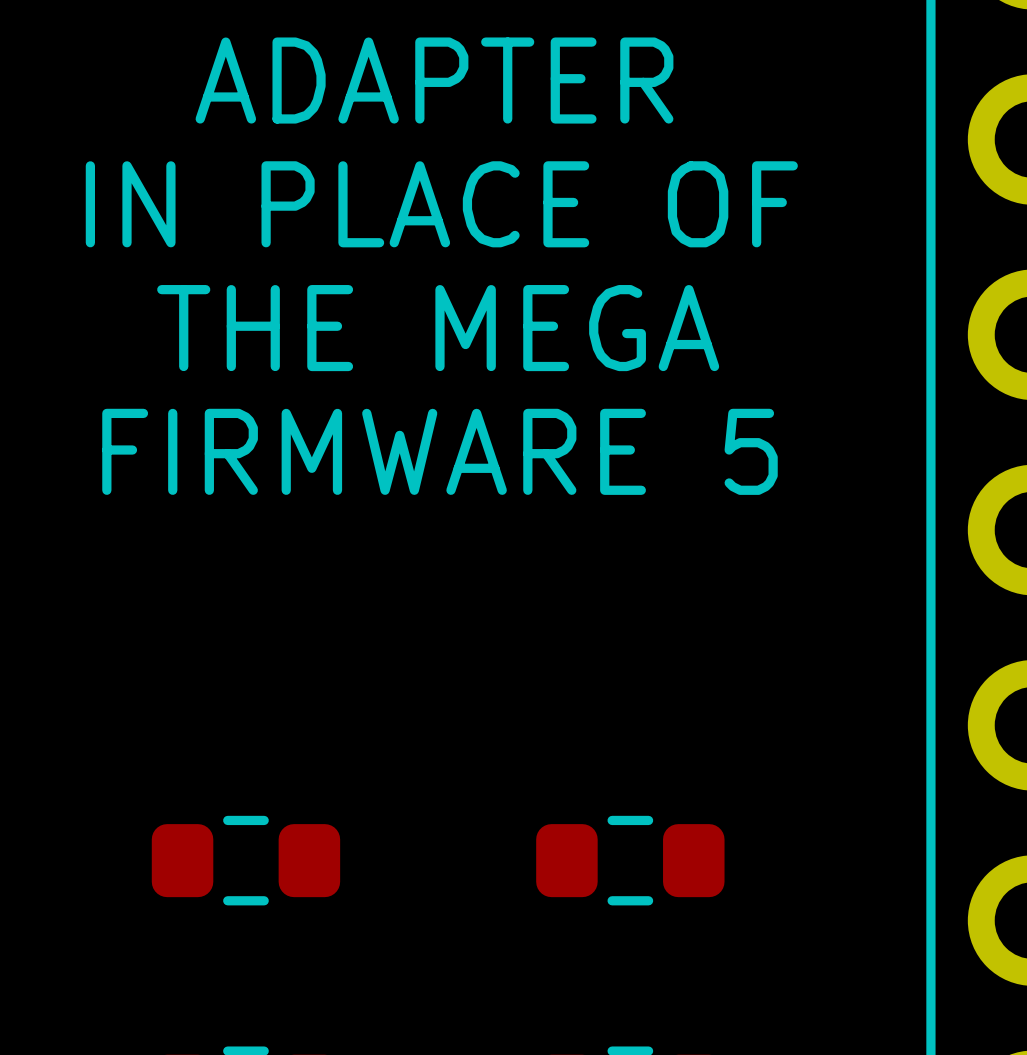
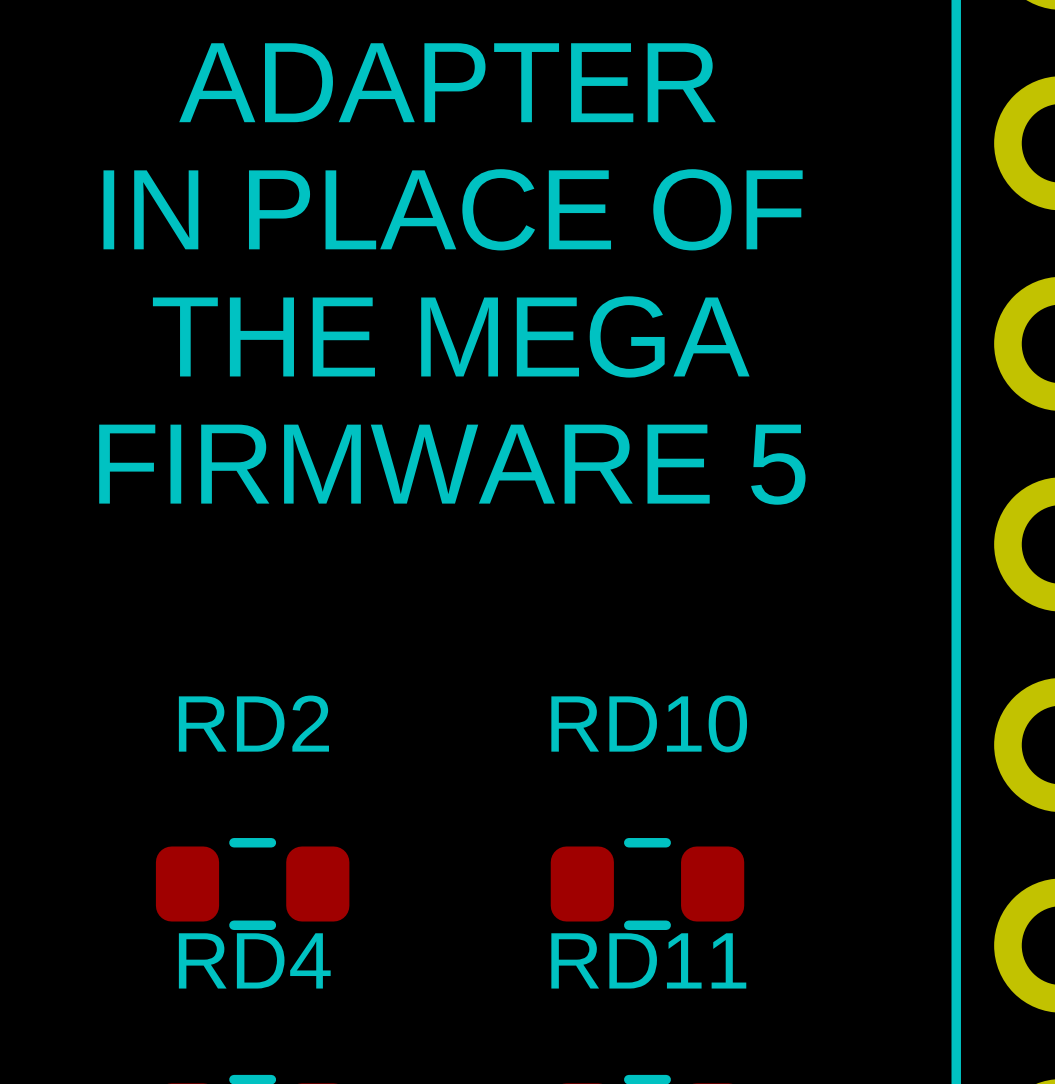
RD2 name: none -> RD2 (253, 723)
RD10 name: none -> RD10 (649, 723)
RD4 name: none -> RD4 (254, 960)
RD11 name: none -> RD11 (648, 960)

